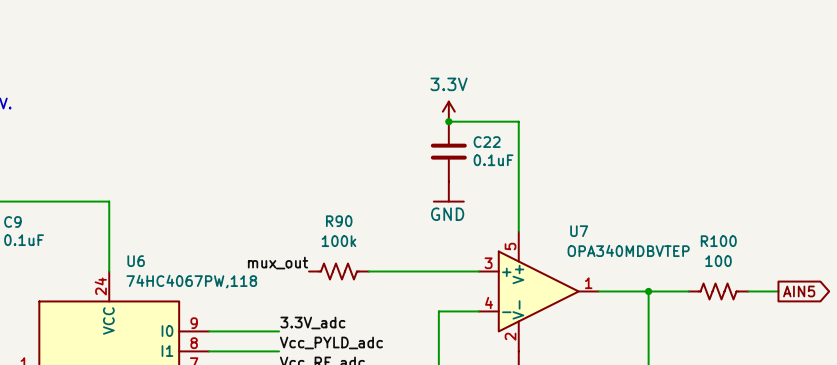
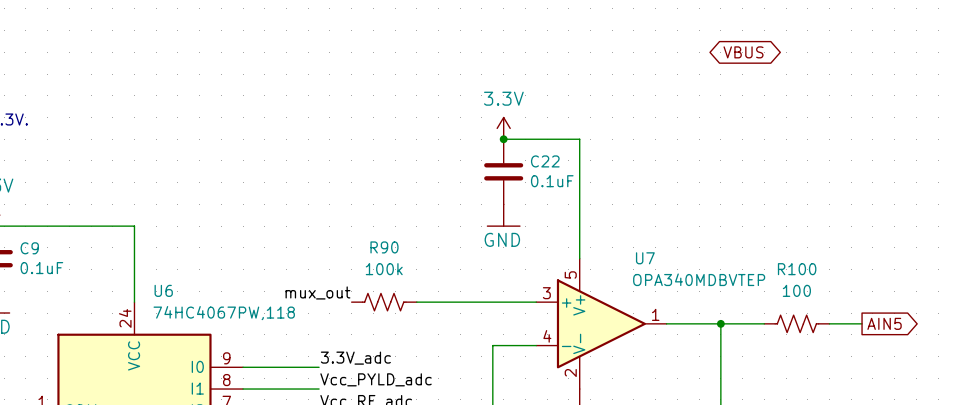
global label: none -> VBUS (743, 52)

